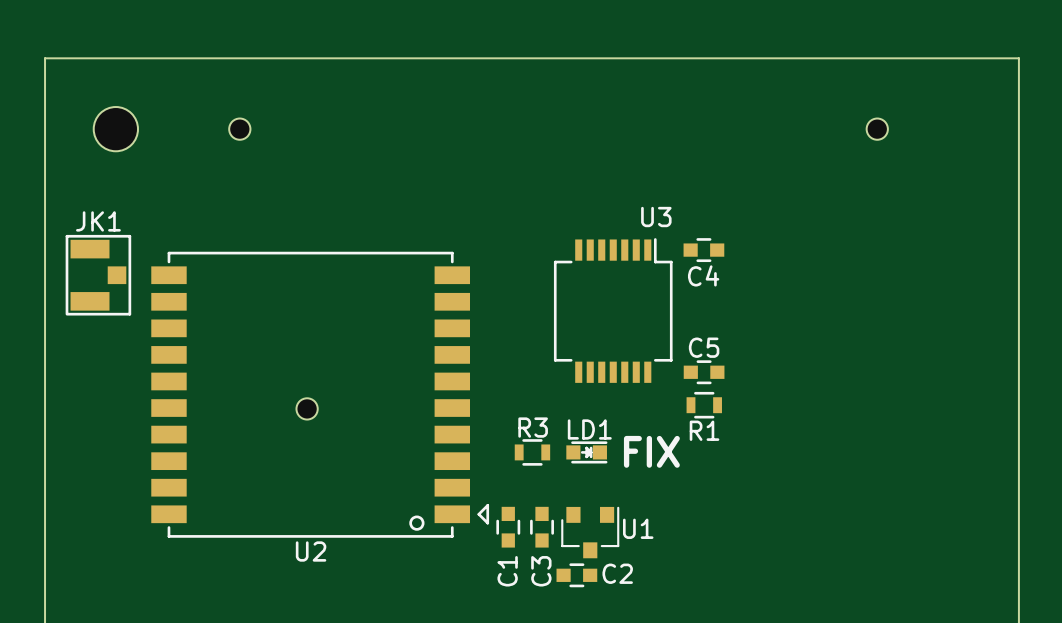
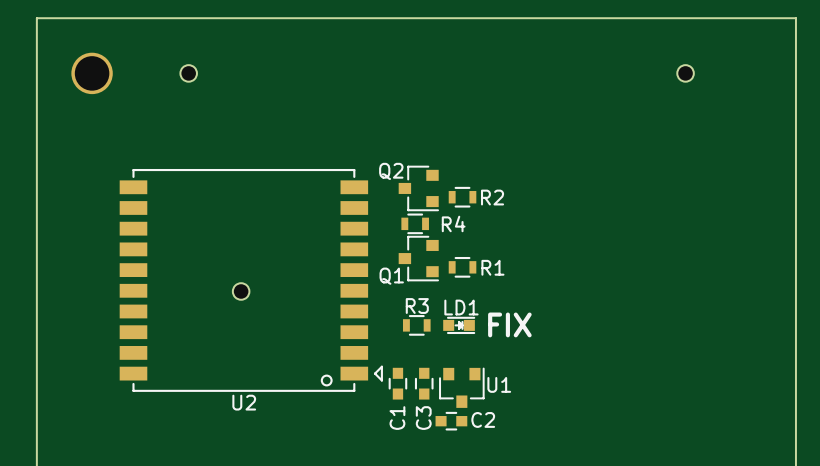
part footprint: [93, 107, 139, 152] -> [71, 52, 113, 95]
C4: (703, 250) -> none
JK1: (98, 275) -> none
Q2: none -> (418, 188)
R2: none -> (462, 197)
U3: (613, 310) -> none
R4: none -> (415, 223)
Q1: none -> (418, 258)
C5: (704, 372) -> none
R1 position: (704, 405) -> (462, 267)
R1 name position: R1 (704, 430) -> R1 (492, 267)

